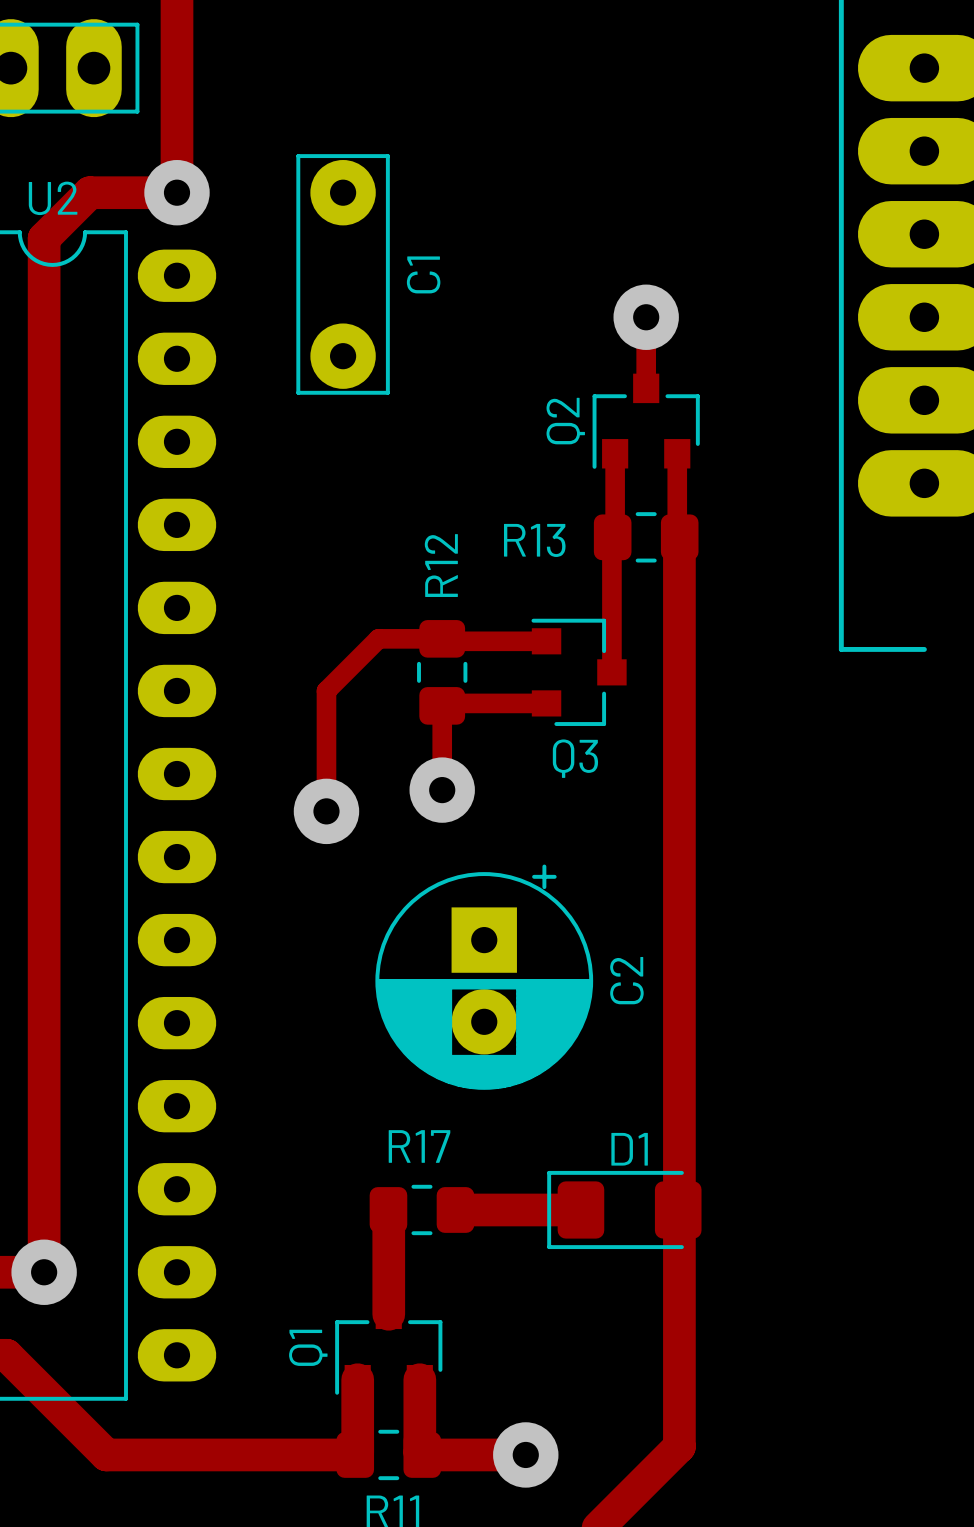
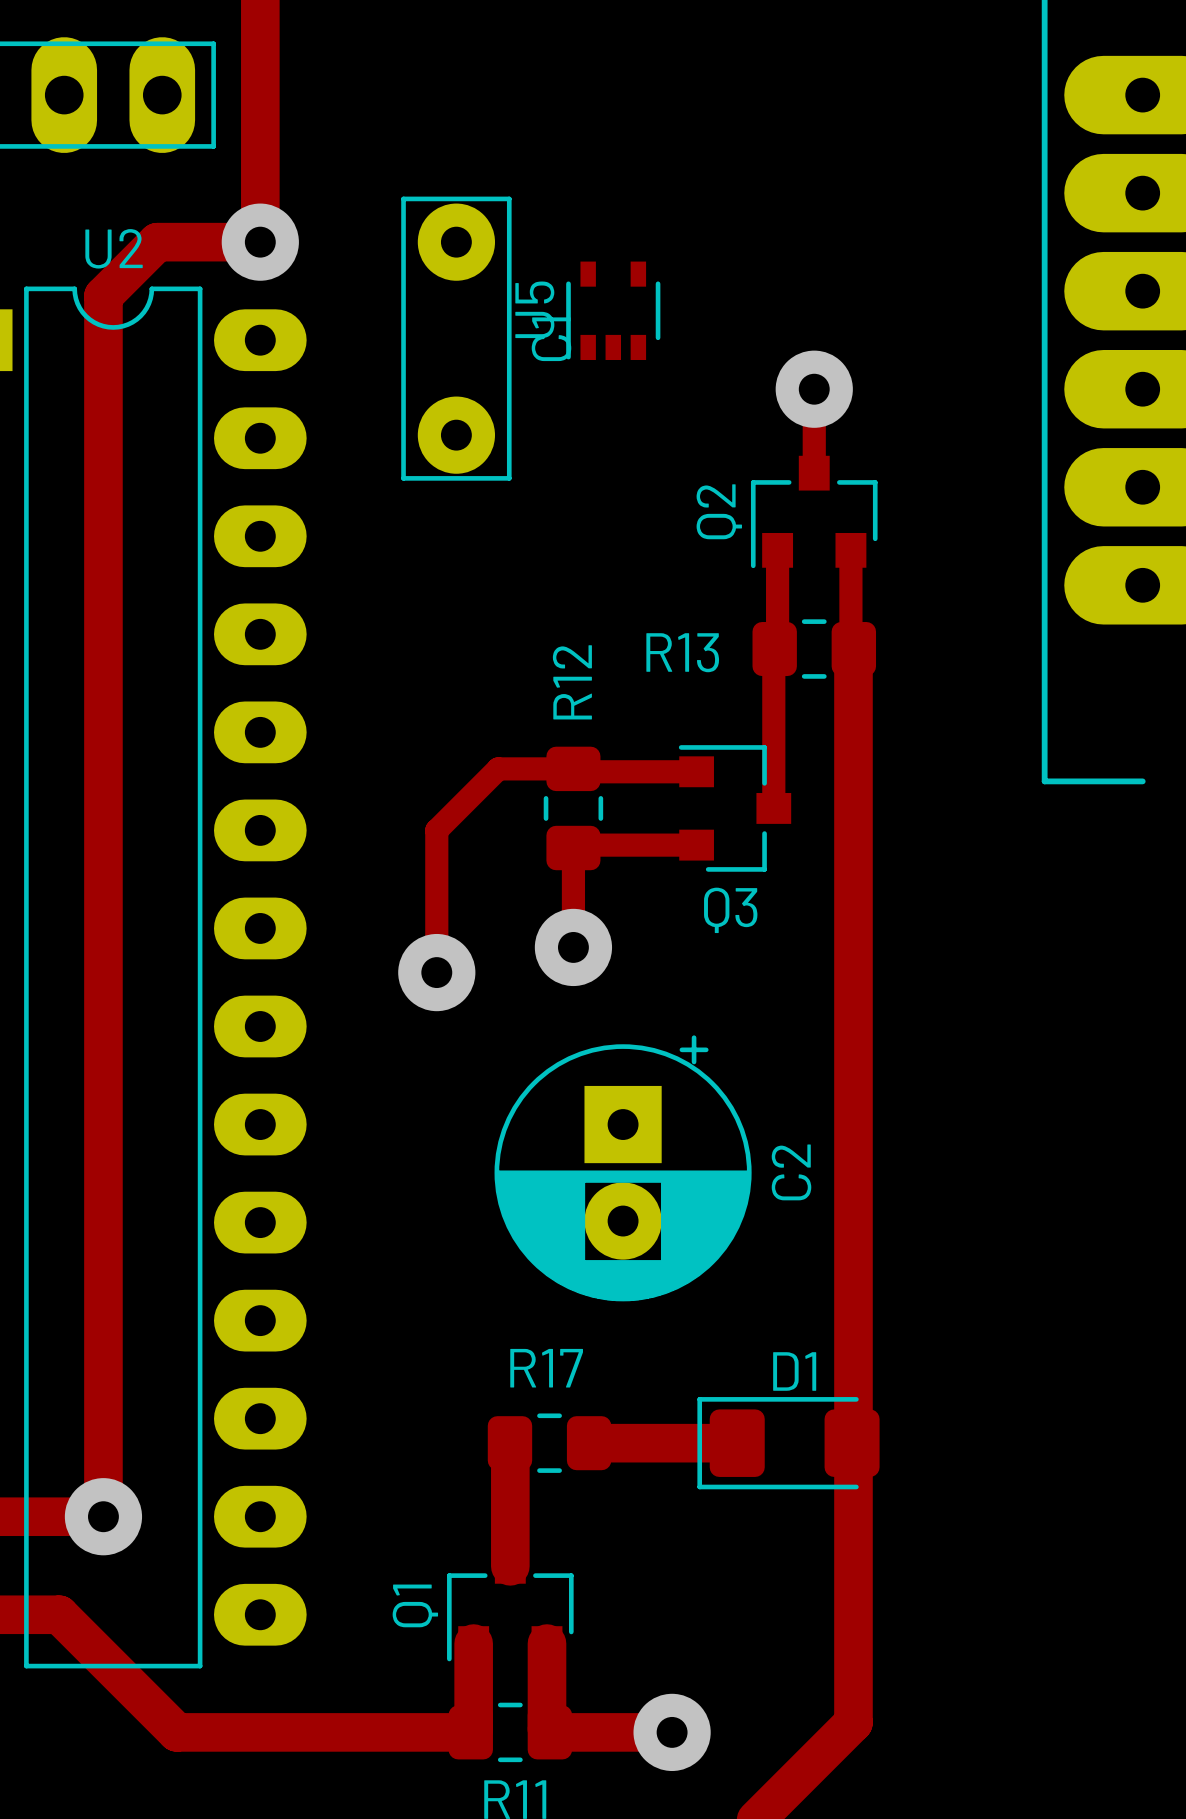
U5: none -> (613, 310)

